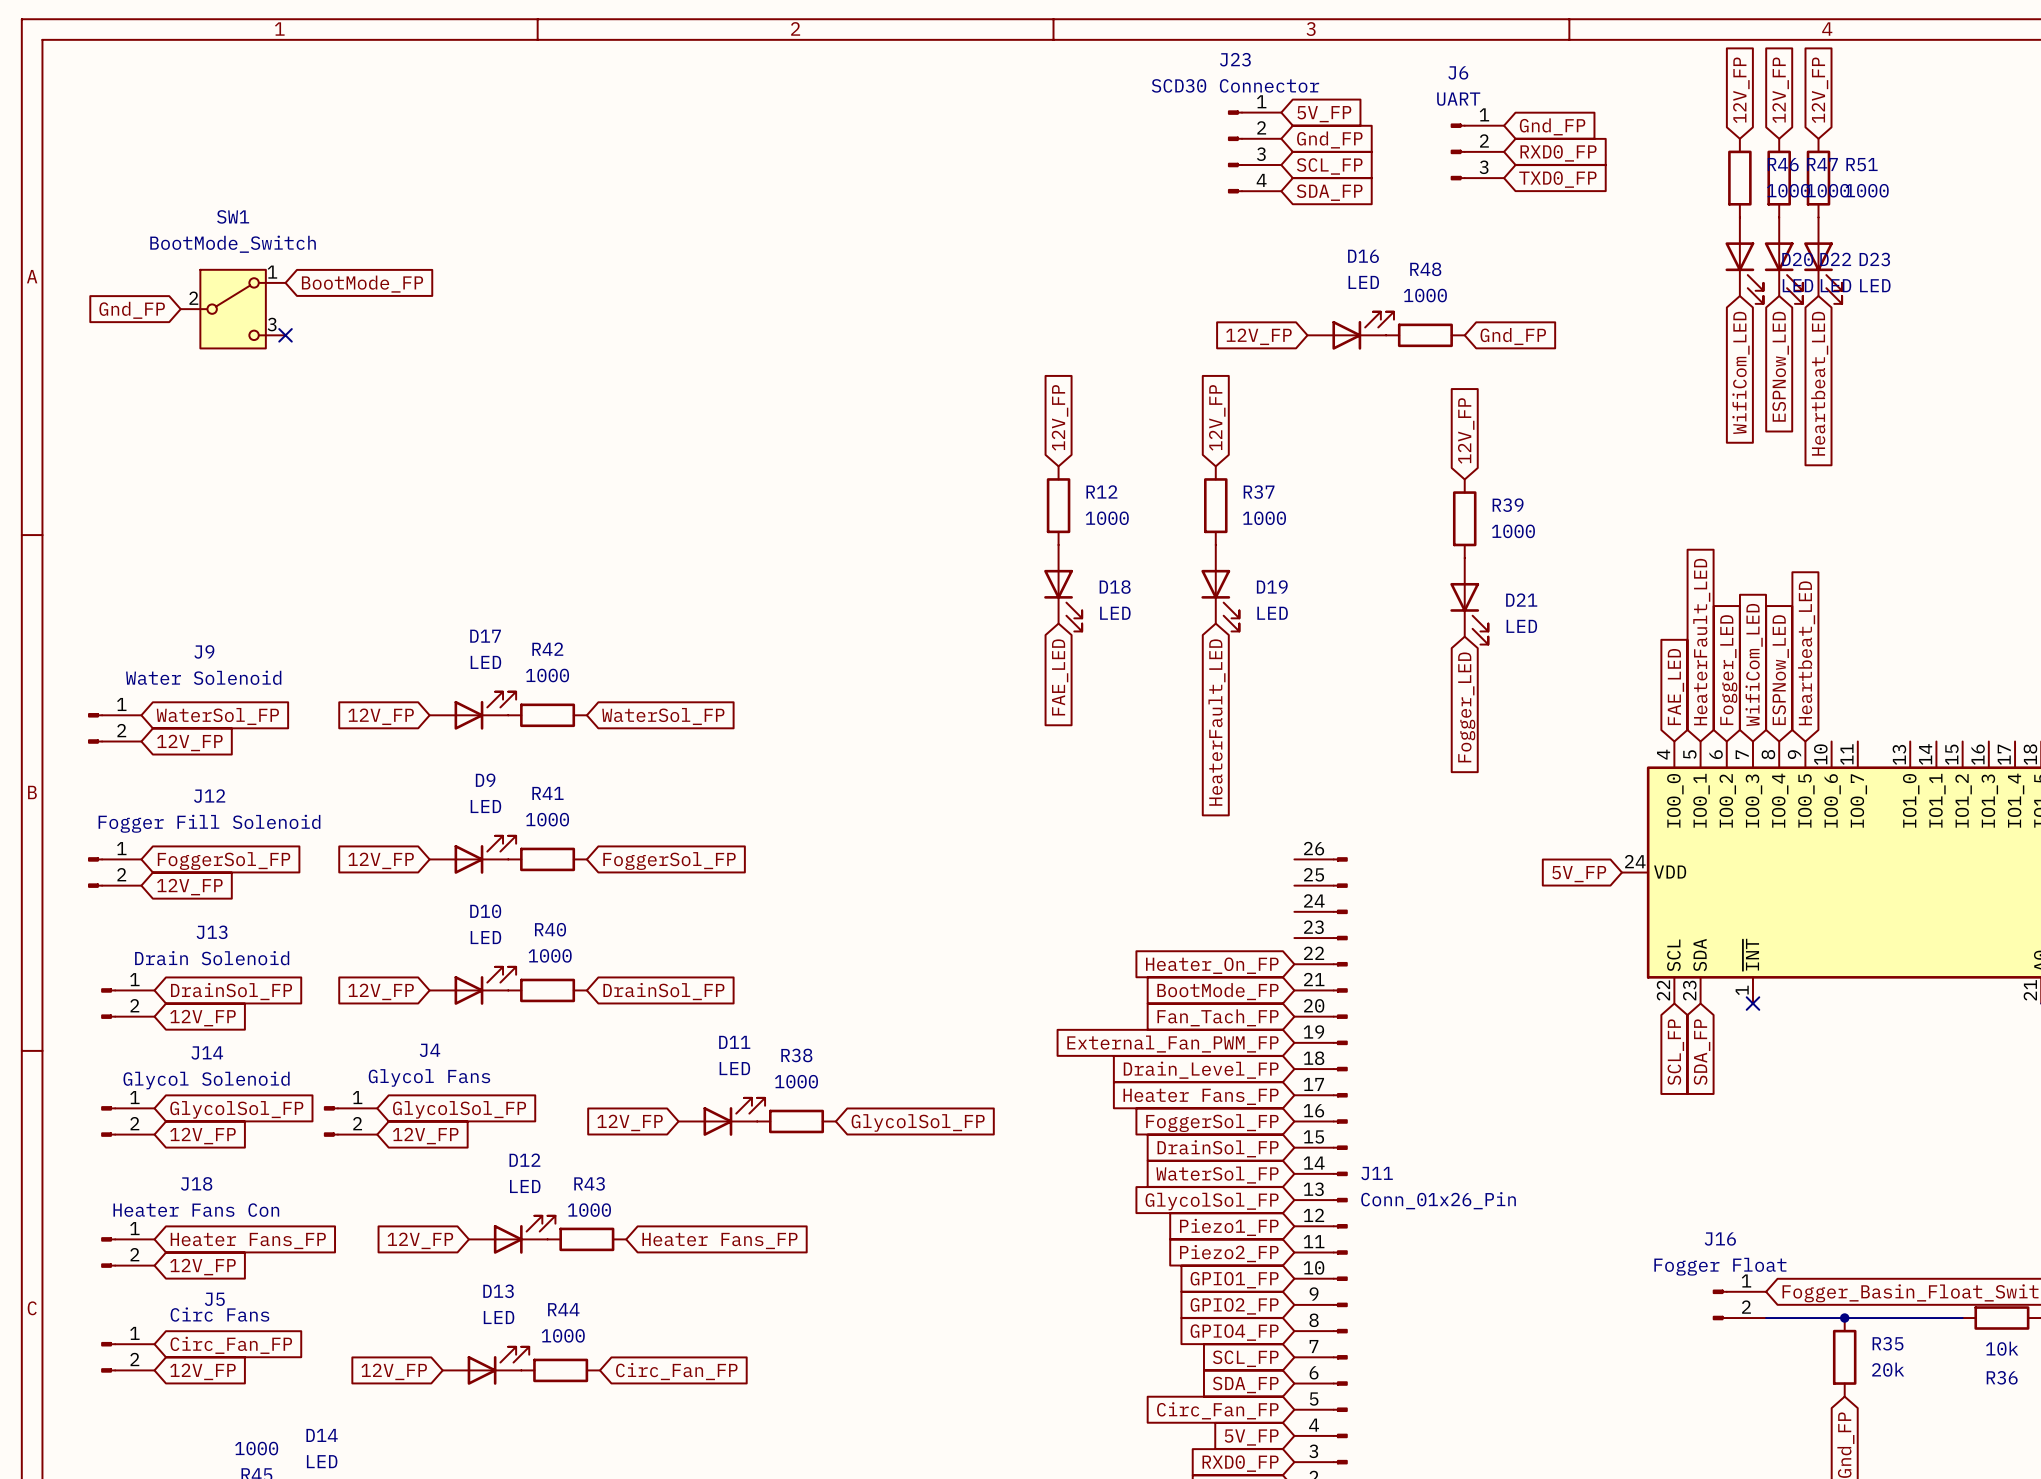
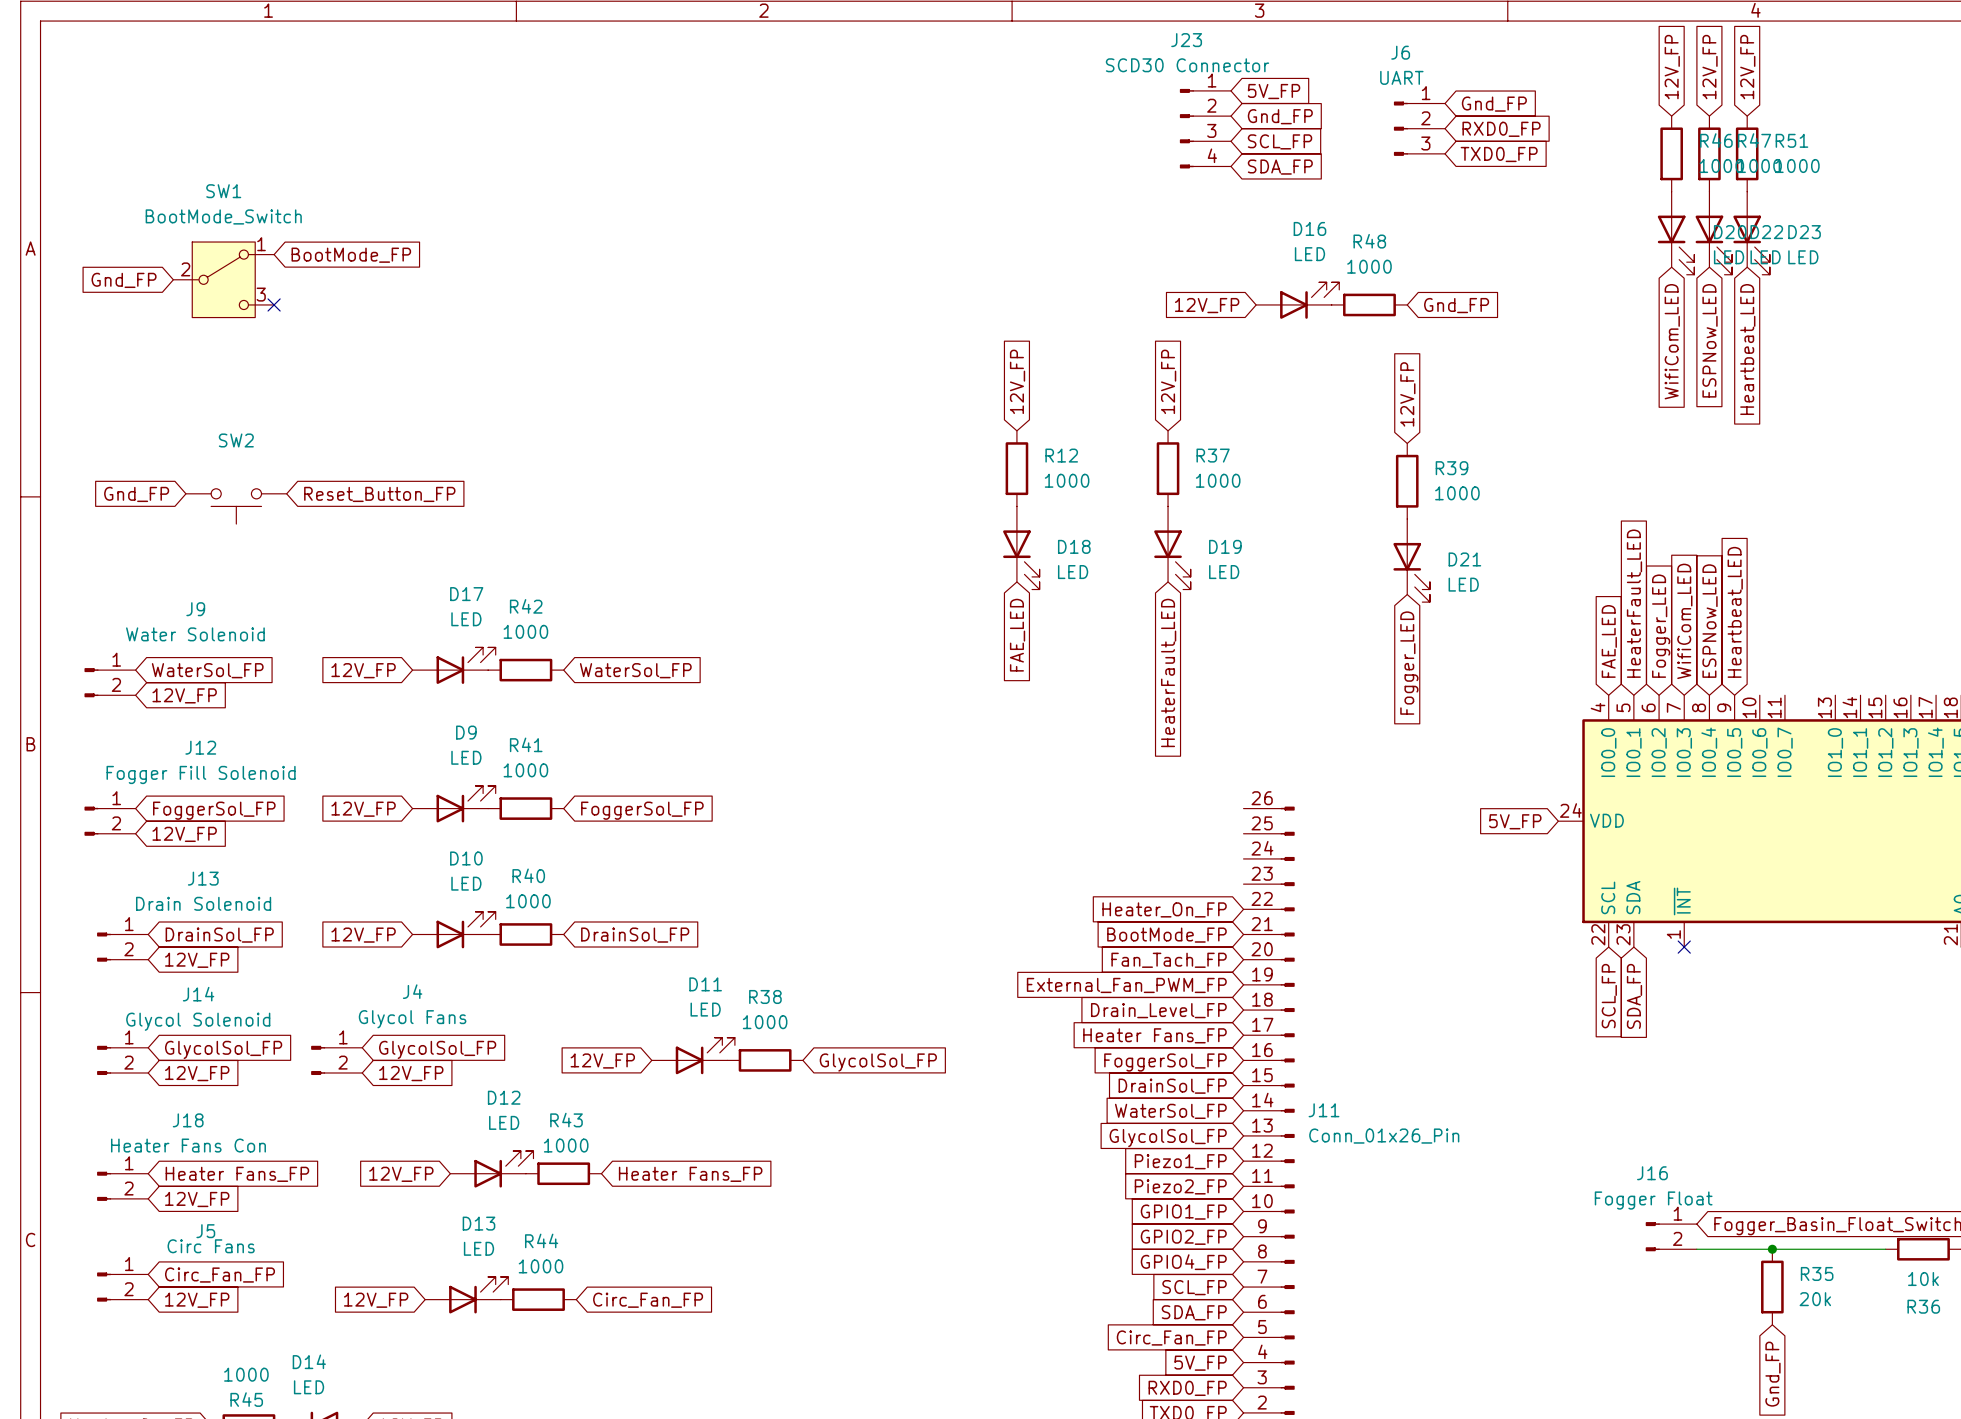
global label: none -> Gnd_FP (136, 494)
global label: none -> Reset_Button_FP (379, 494)
SW2: none -> (236, 506)

